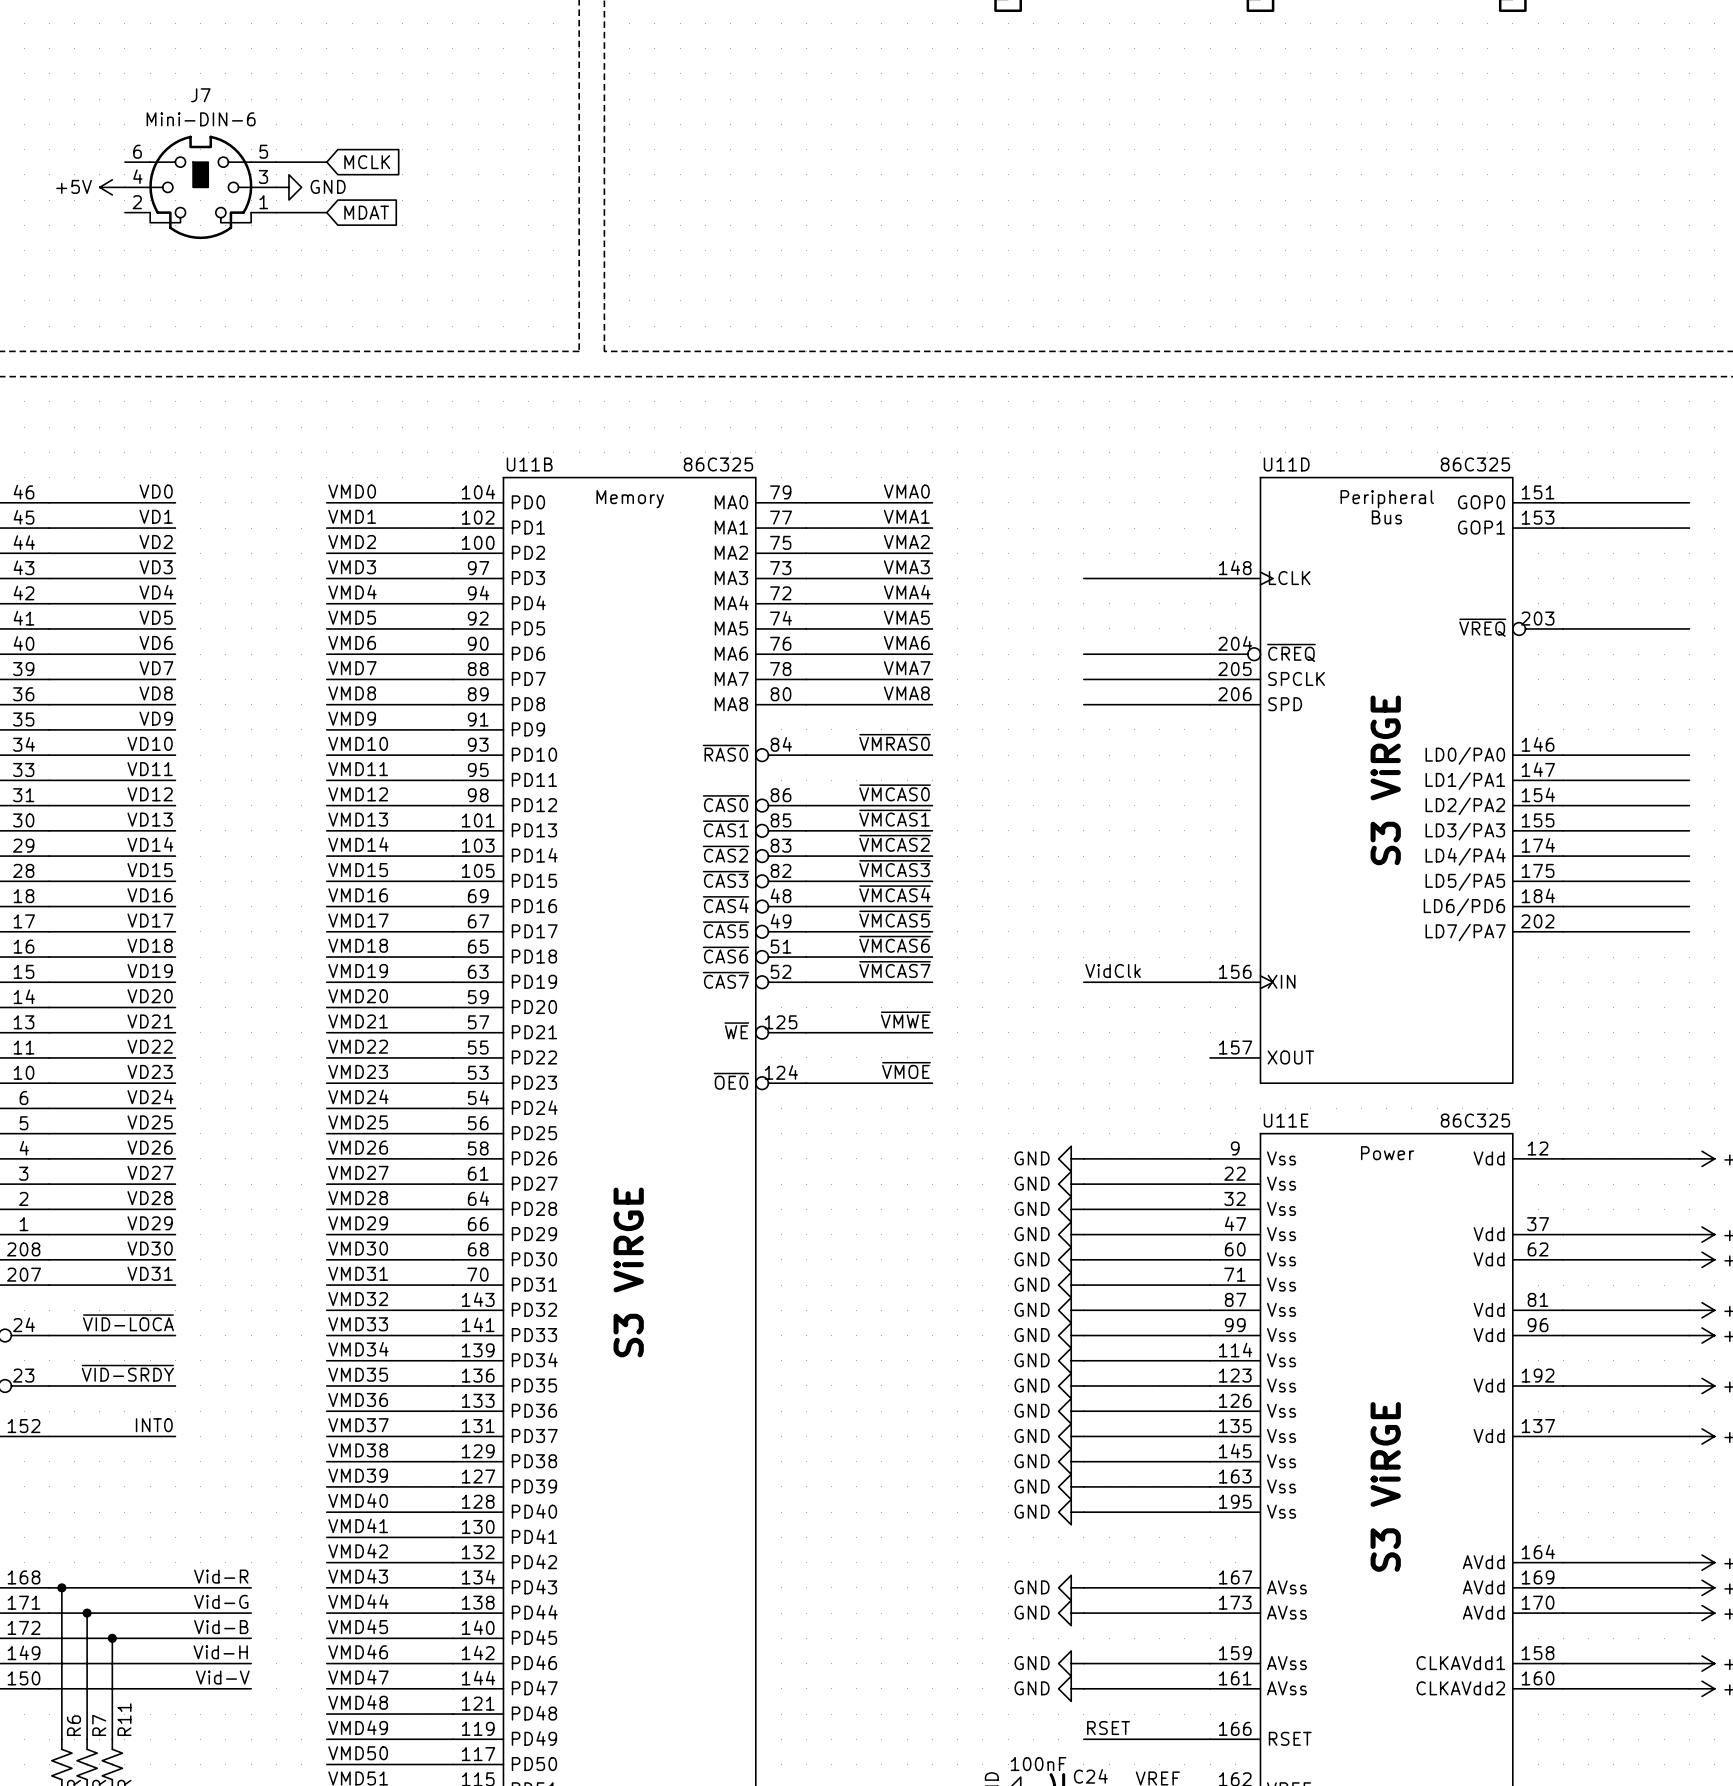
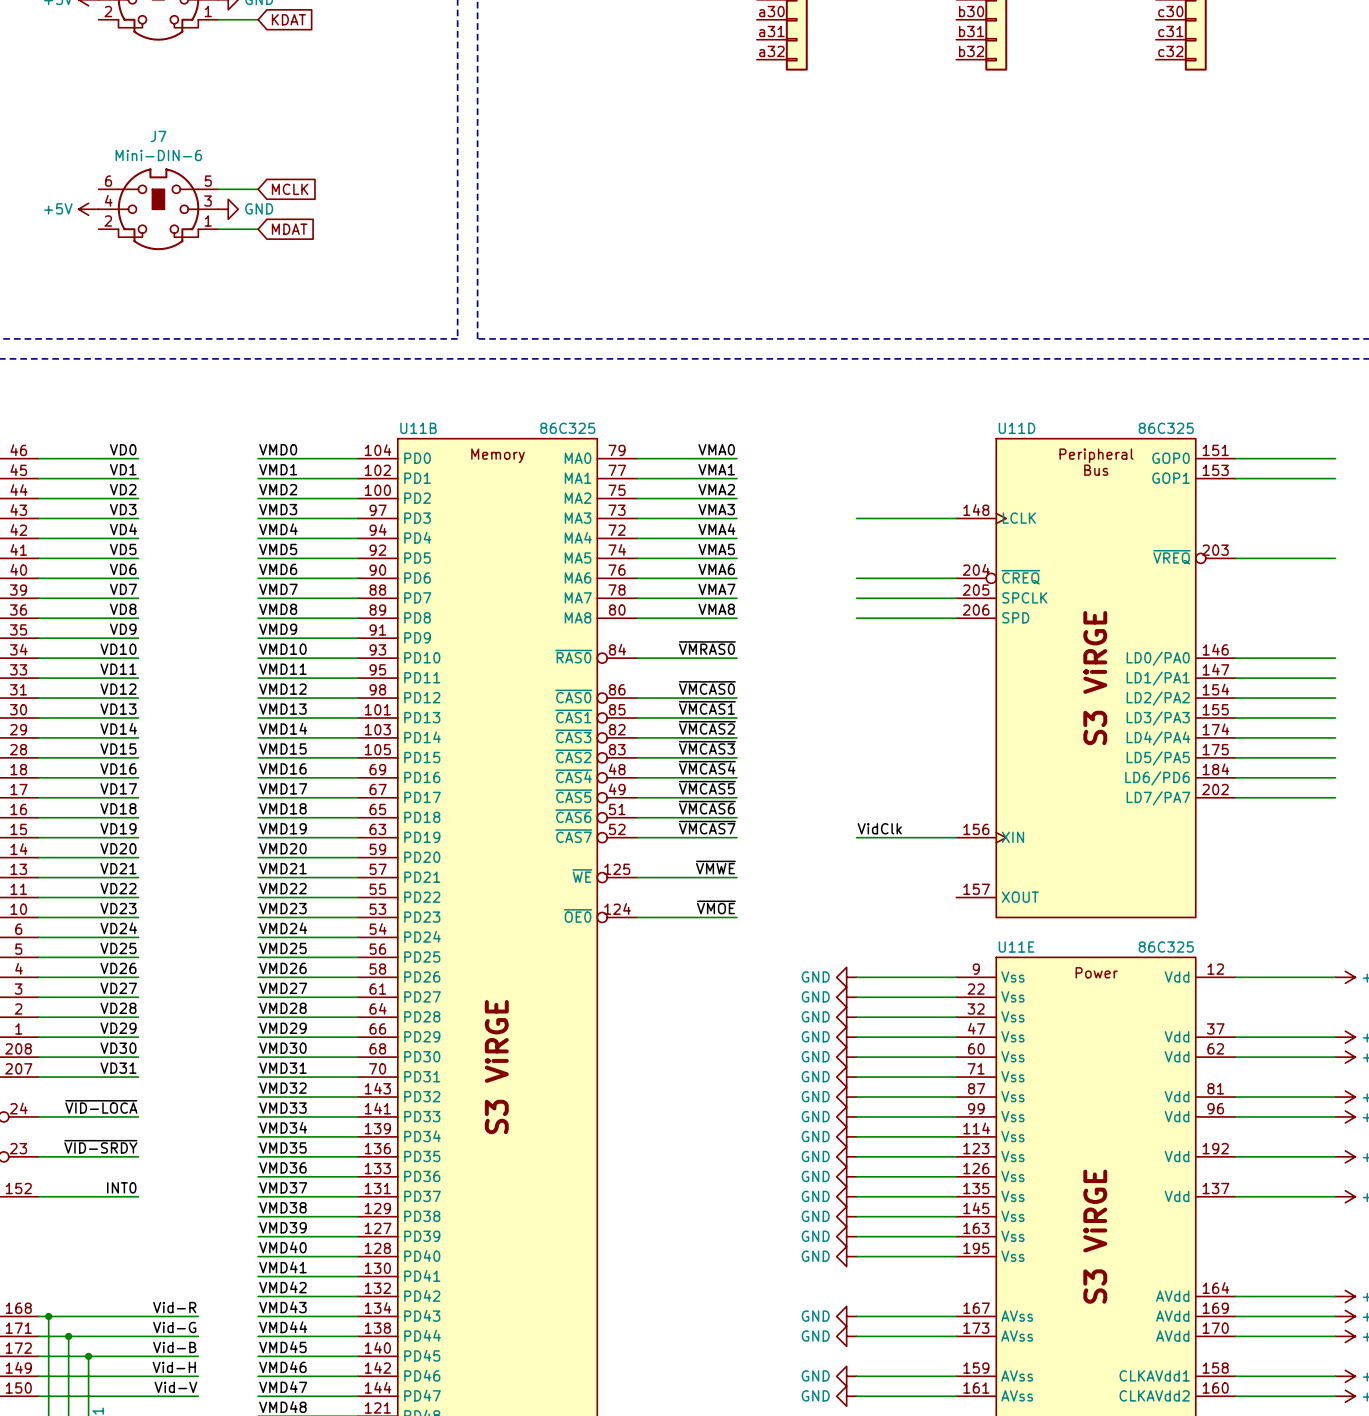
U11B pin number: 83 (781, 845) -> 82 (617, 729)
U11B pin name: ~{CAS2} (726, 854) -> ~{CAS3} (573, 736)
U11B pin number: 82 (781, 870) -> 83 (617, 749)
U11B pin name: ~{CAS3} (726, 879) -> ~{CAS2} (573, 756)

